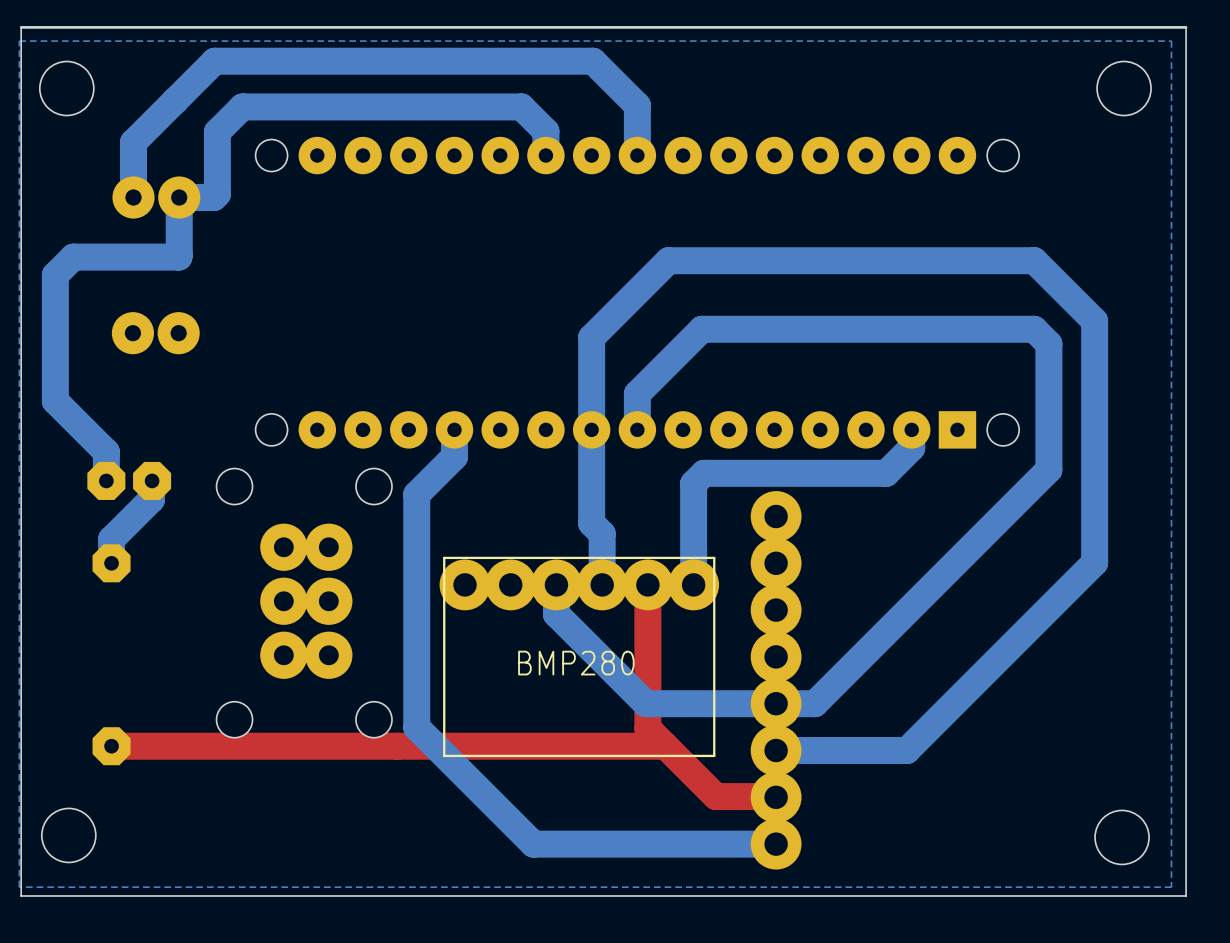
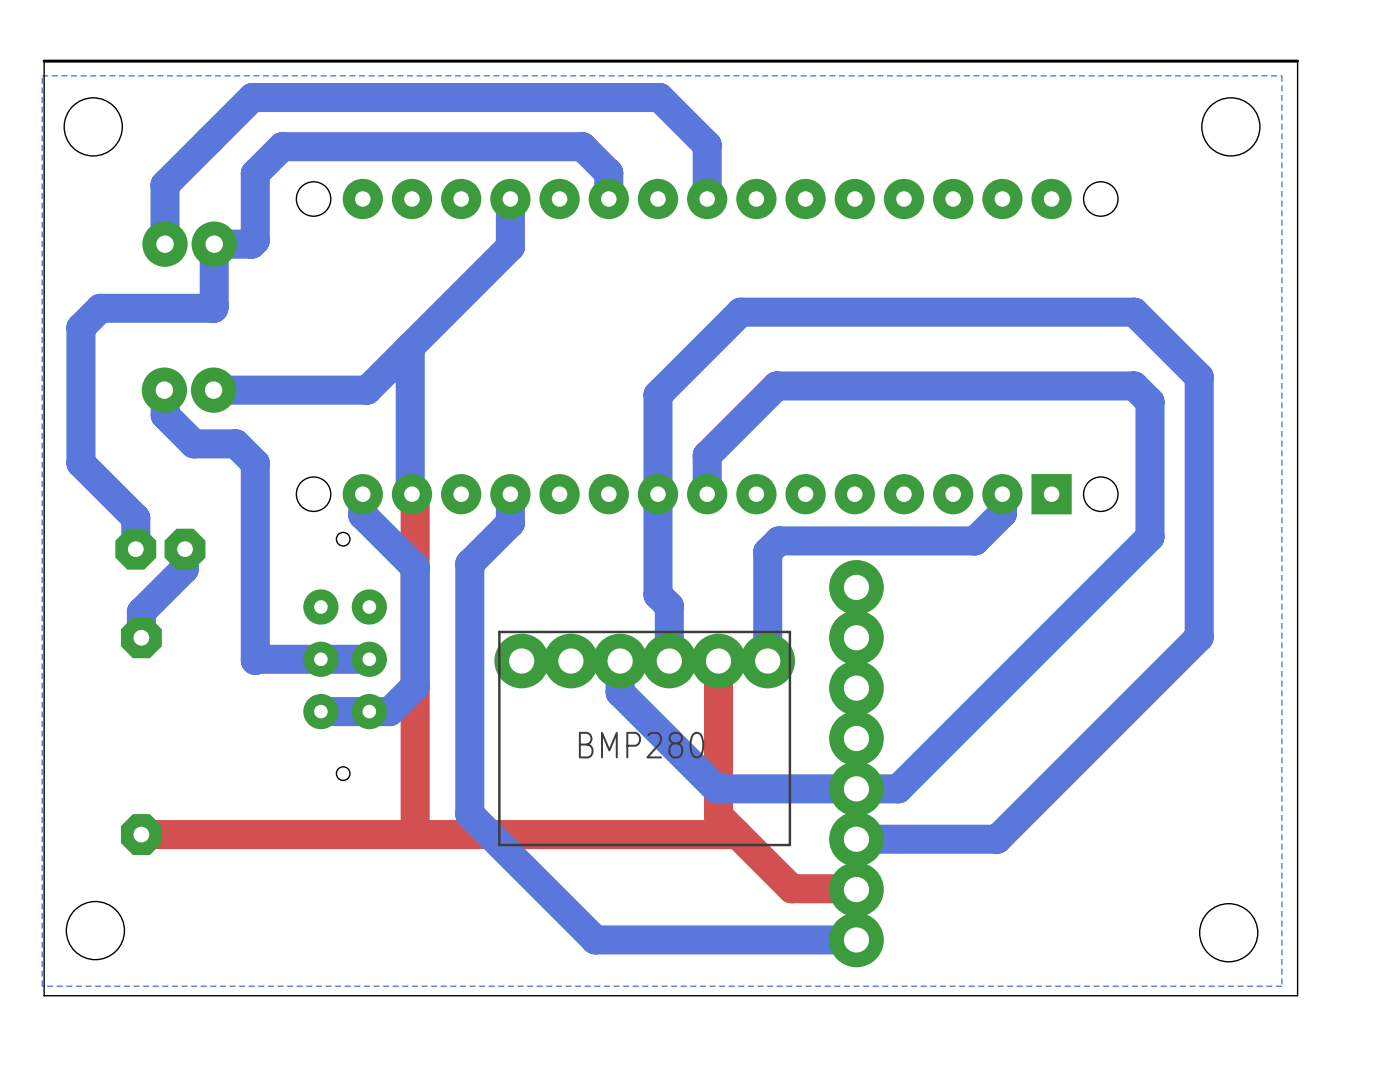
bottom track: none -> (510, 199) (510, 246) (367, 390) (213, 390)
bottom track: none -> (410, 347) (410, 492) (411, 494)
bottom track: none -> (164, 390) (165, 415) (193, 443) (235, 443) (255, 463) (255, 660) (369, 659)
bottom track: none -> (362, 494) (362, 515) (415, 567) (415, 686) (389, 711) (320, 711)
top track: none -> (411, 494) (415, 497) (415, 834)
part: none -> (345, 656)
part: (304, 603) -> none

